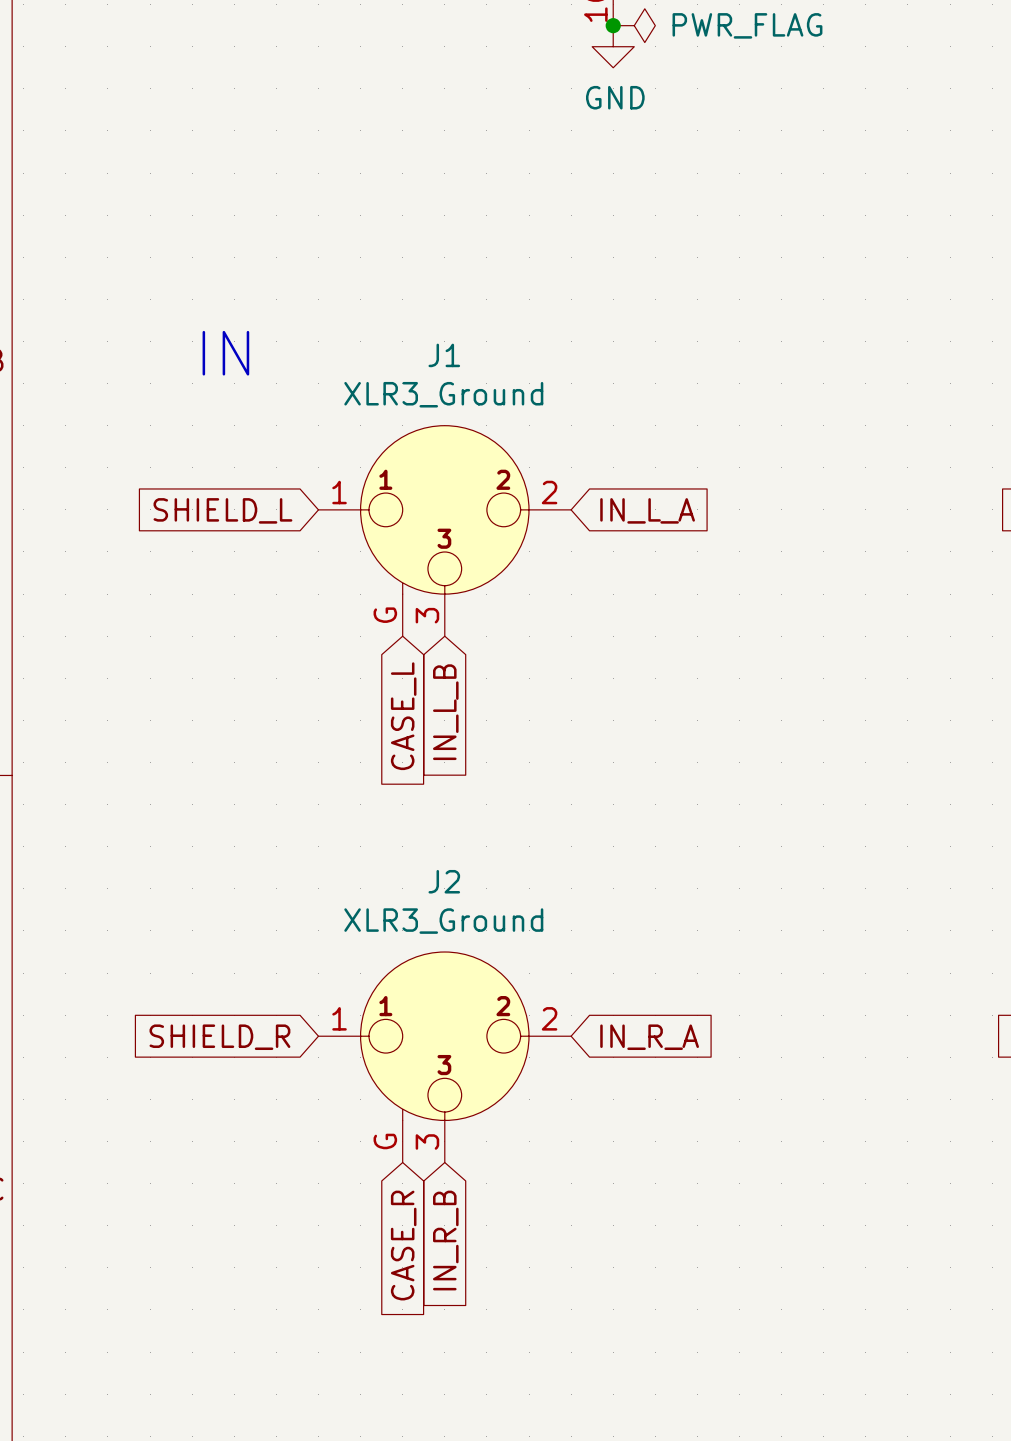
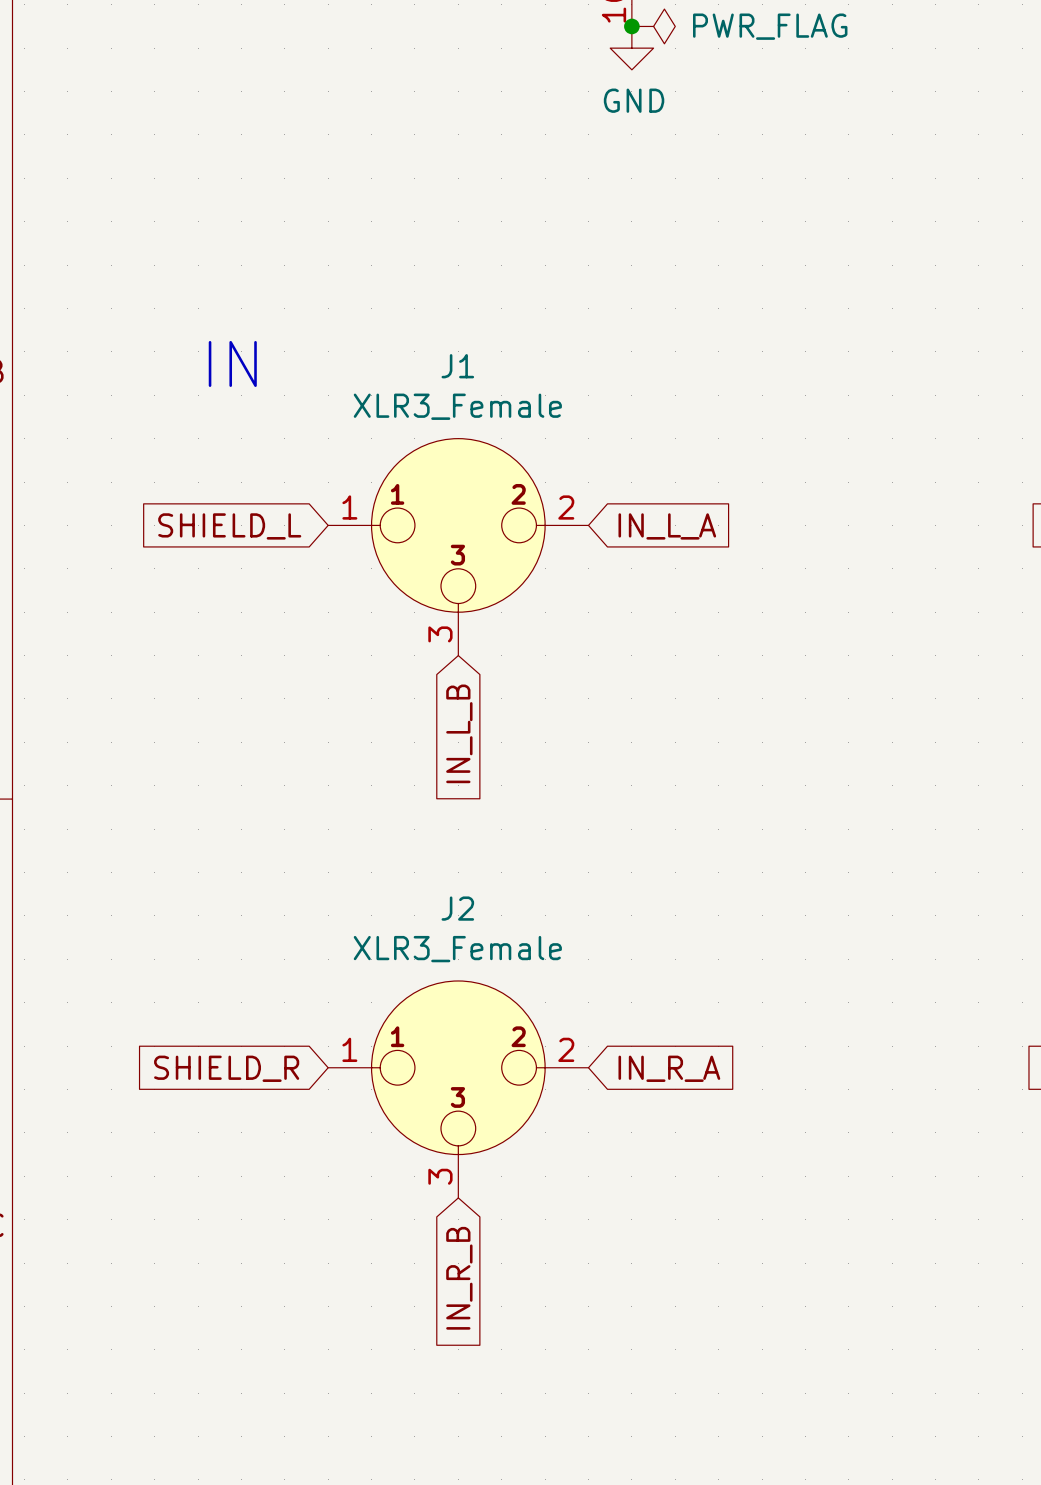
J1 value: XLR3_Ground (443, 394) -> XLR3_Female (457, 406)
J1 symbol: [318, 425, 572, 637] -> [328, 438, 589, 656]
global label: CASE_L (403, 716) -> none
J2 value: XLR3_Ground (443, 921) -> XLR3_Female (457, 949)
J2 symbol: [318, 952, 572, 1163] -> [328, 980, 589, 1198]
global label: CASE_R (403, 1245) -> none

